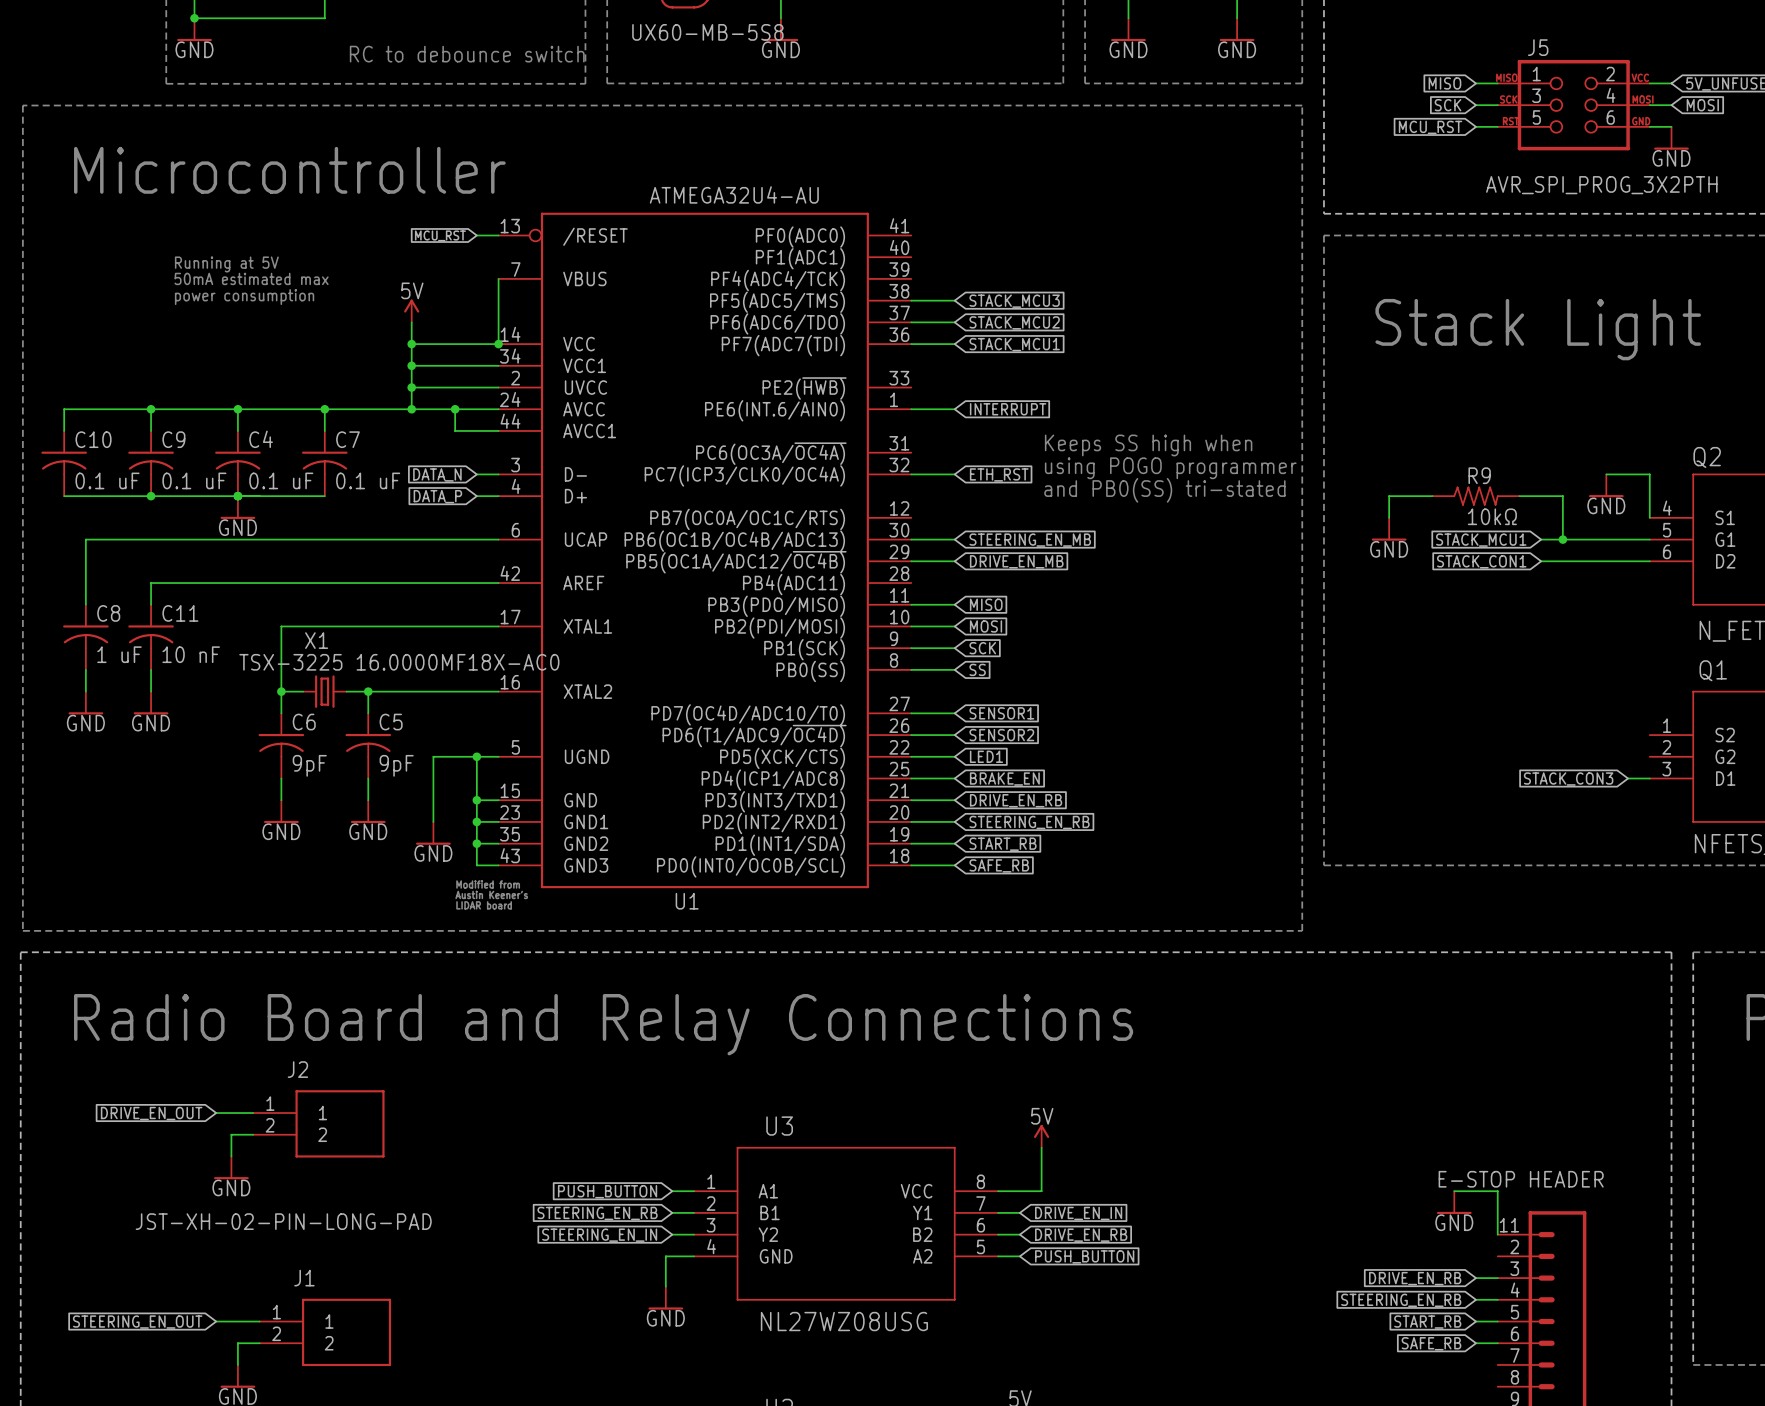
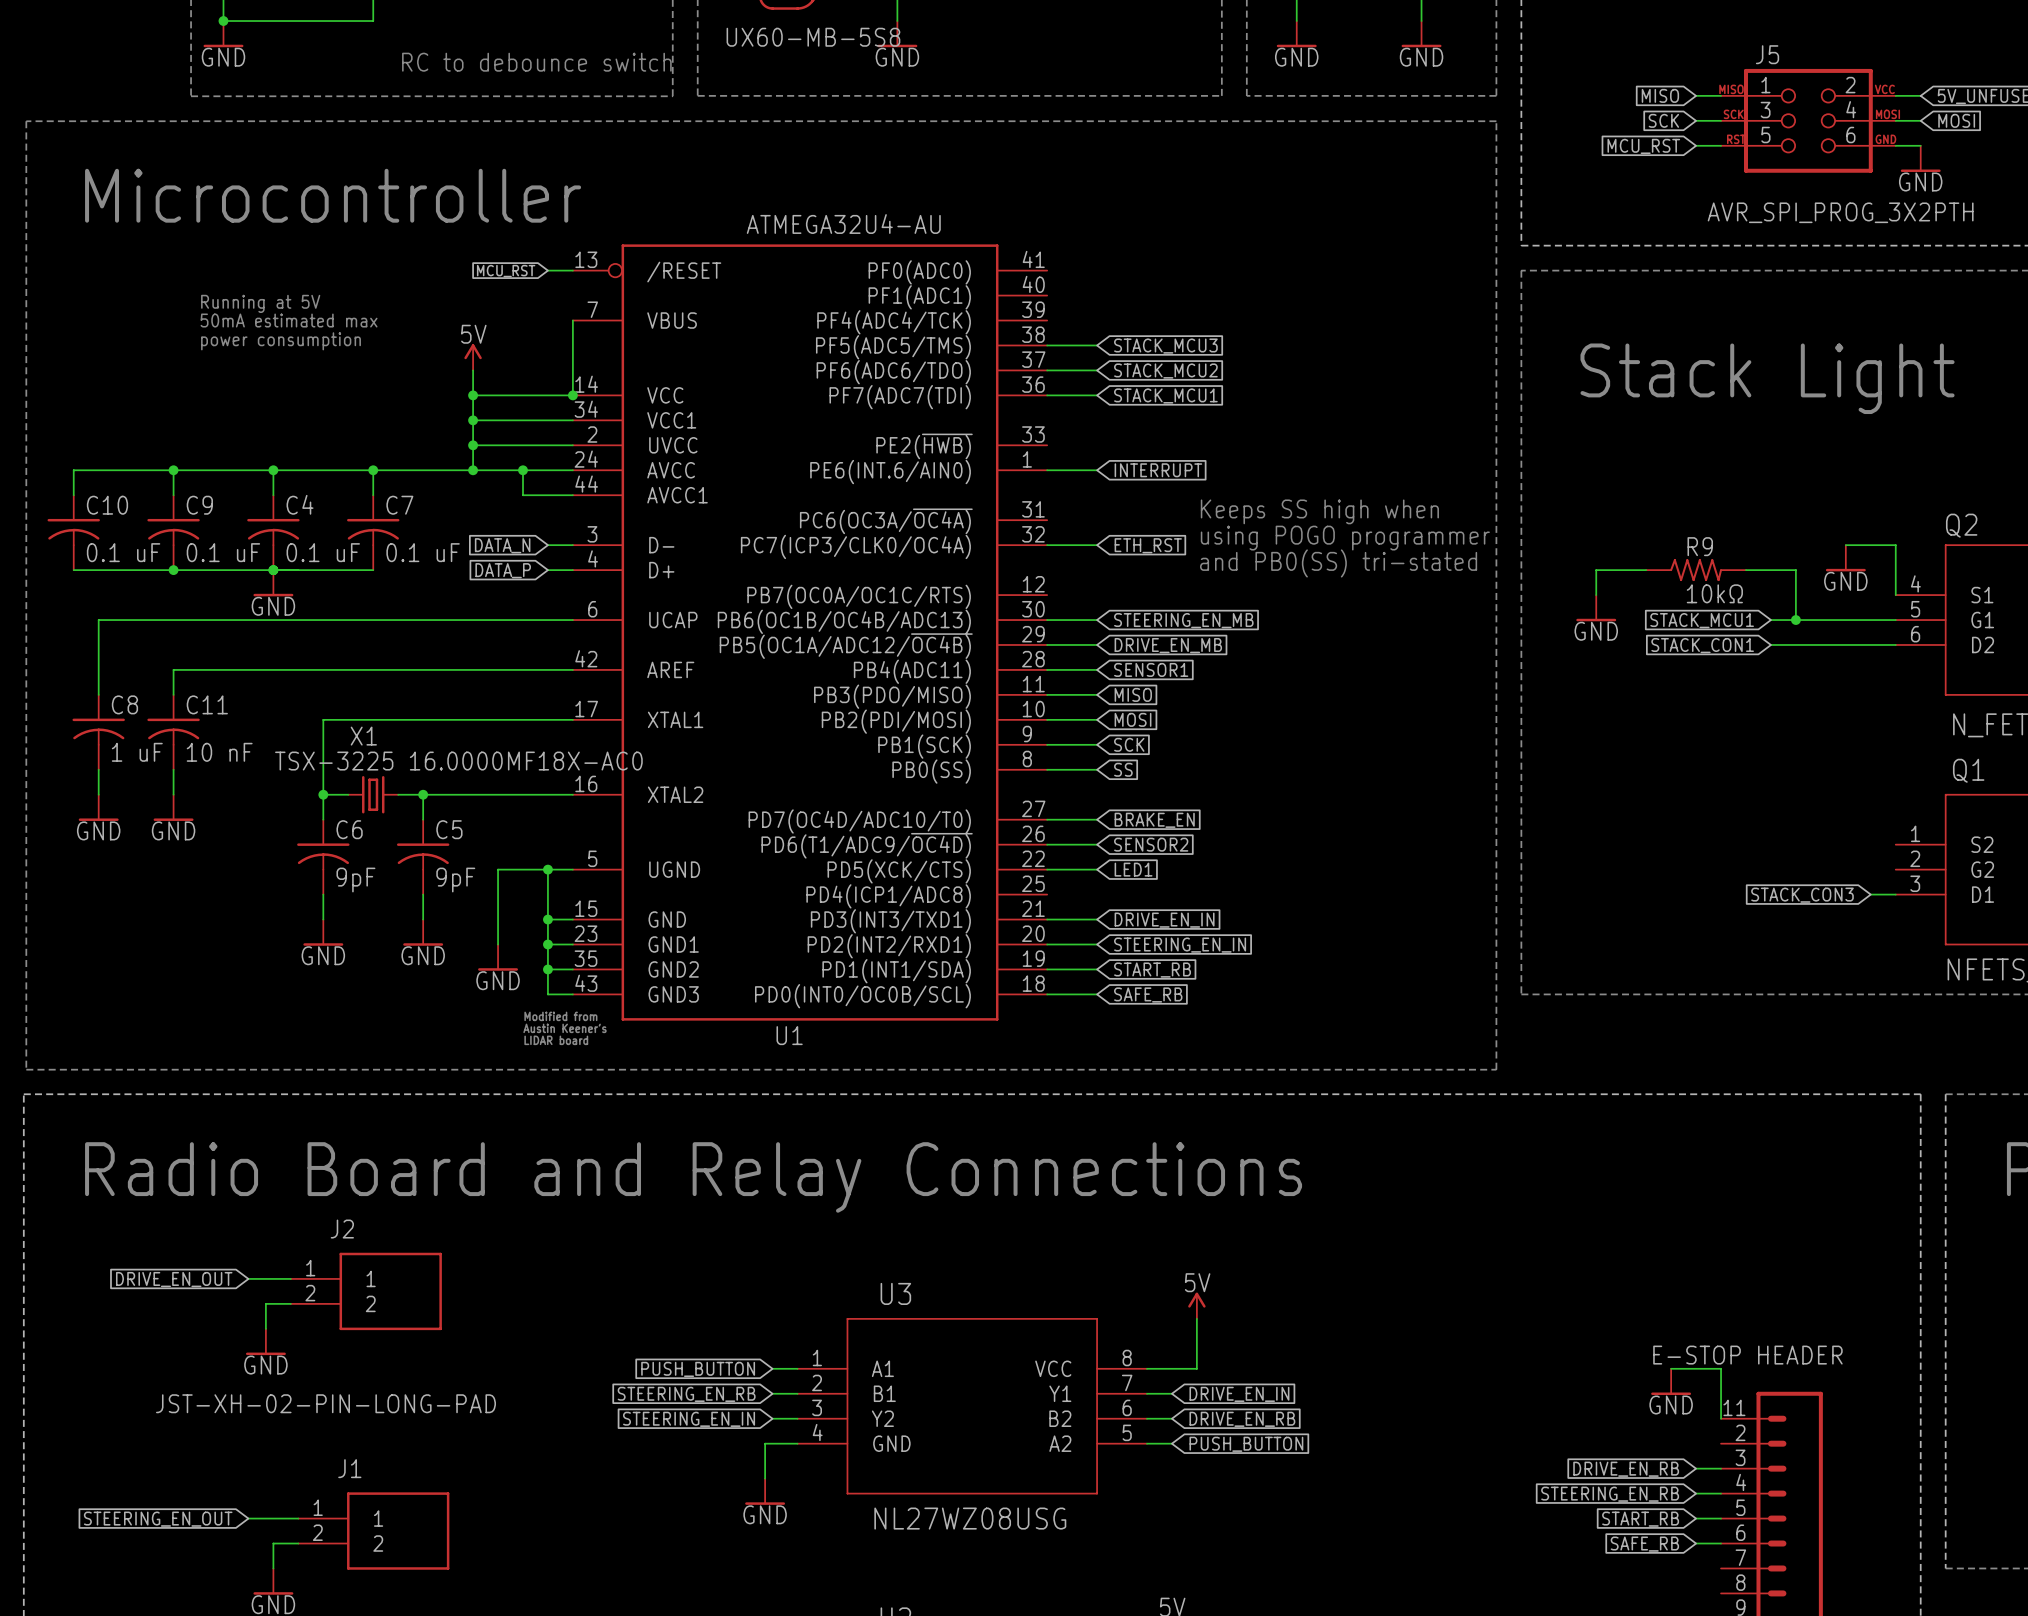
global label: none -> SENSOR1 (1151, 669)
global label: SENSOR1 (1001, 713) -> BRAKE_EN (1154, 820)
wire: (911, 778) (954, 778) -> (1047, 669) (1097, 669)
global label: BRAKE_EN (1004, 779) -> none
global label: DRIVE_EN_RB (1016, 800) -> DRIVE_EN_IN (1164, 920)
global label: STEERING_EN_RB (1029, 822) -> STEERING_EN_IN (1180, 945)

